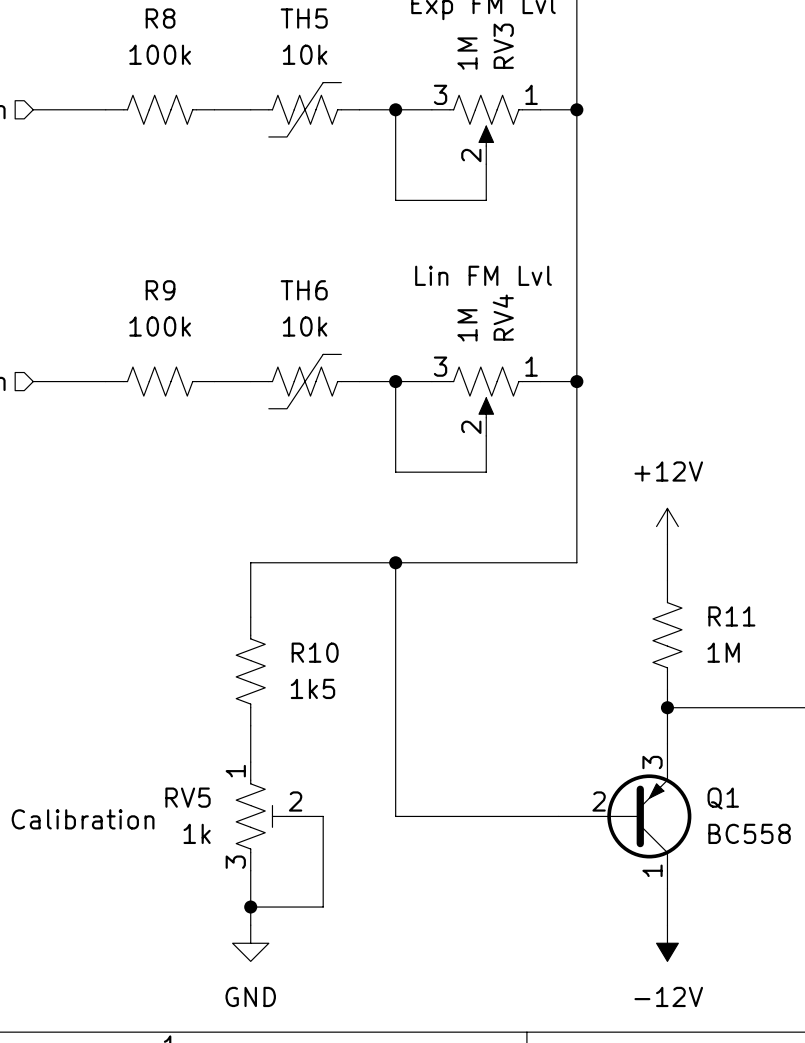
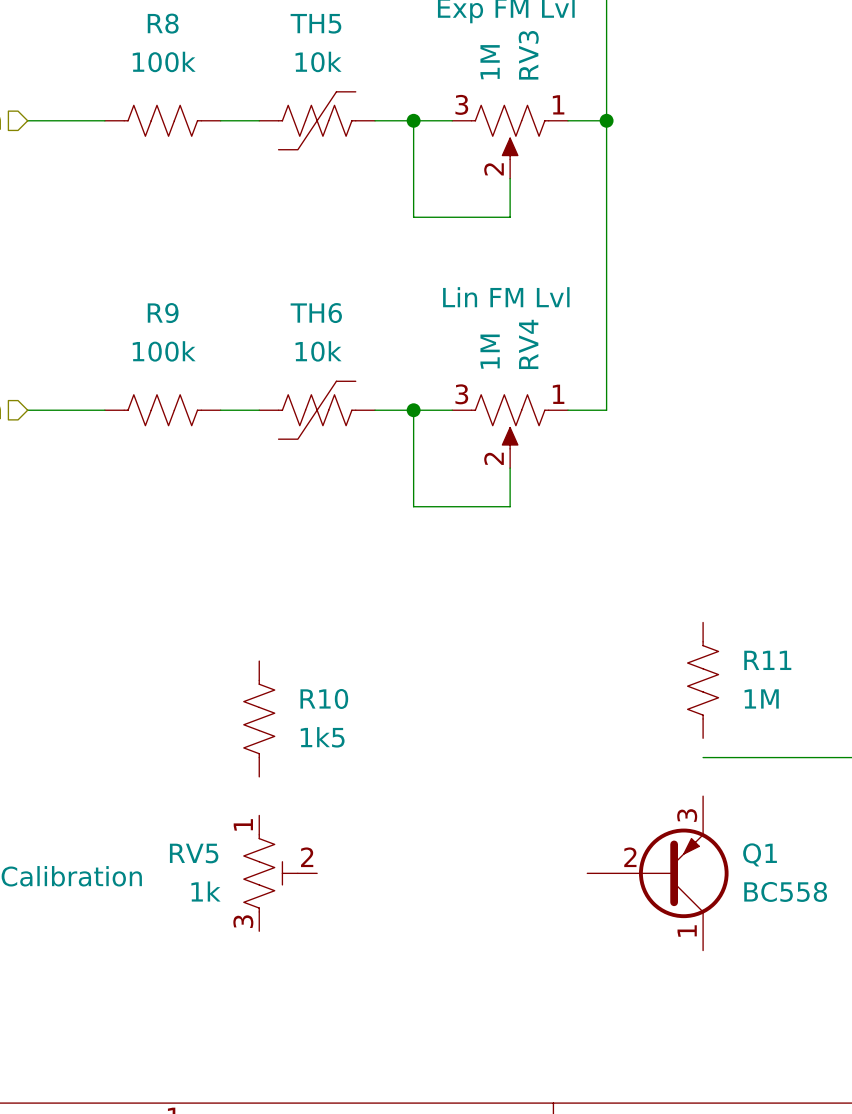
wire: (576, 381) (576, 562) (250, 562) (250, 617) -> none
junction: (576, 381) -> none
power symbol: +12V (667, 526) -> none
wire: (667, 544) (667, 580) -> none
wire: (395, 562) (395, 816) (558, 816) -> none
junction: (395, 562) -> none
wire: (667, 689) (667, 743) -> none
junction: (667, 707) -> none
wire: (250, 725) (250, 762) -> none
wire: (305, 816) (323, 816) (323, 907) (250, 907) -> none
wire: (250, 870) (250, 925) -> none
wire: (667, 888) (667, 925) -> none
junction: (250, 907) -> none
power symbol: GND (250, 943) -> none
power symbol: -12V (667, 943) -> none

